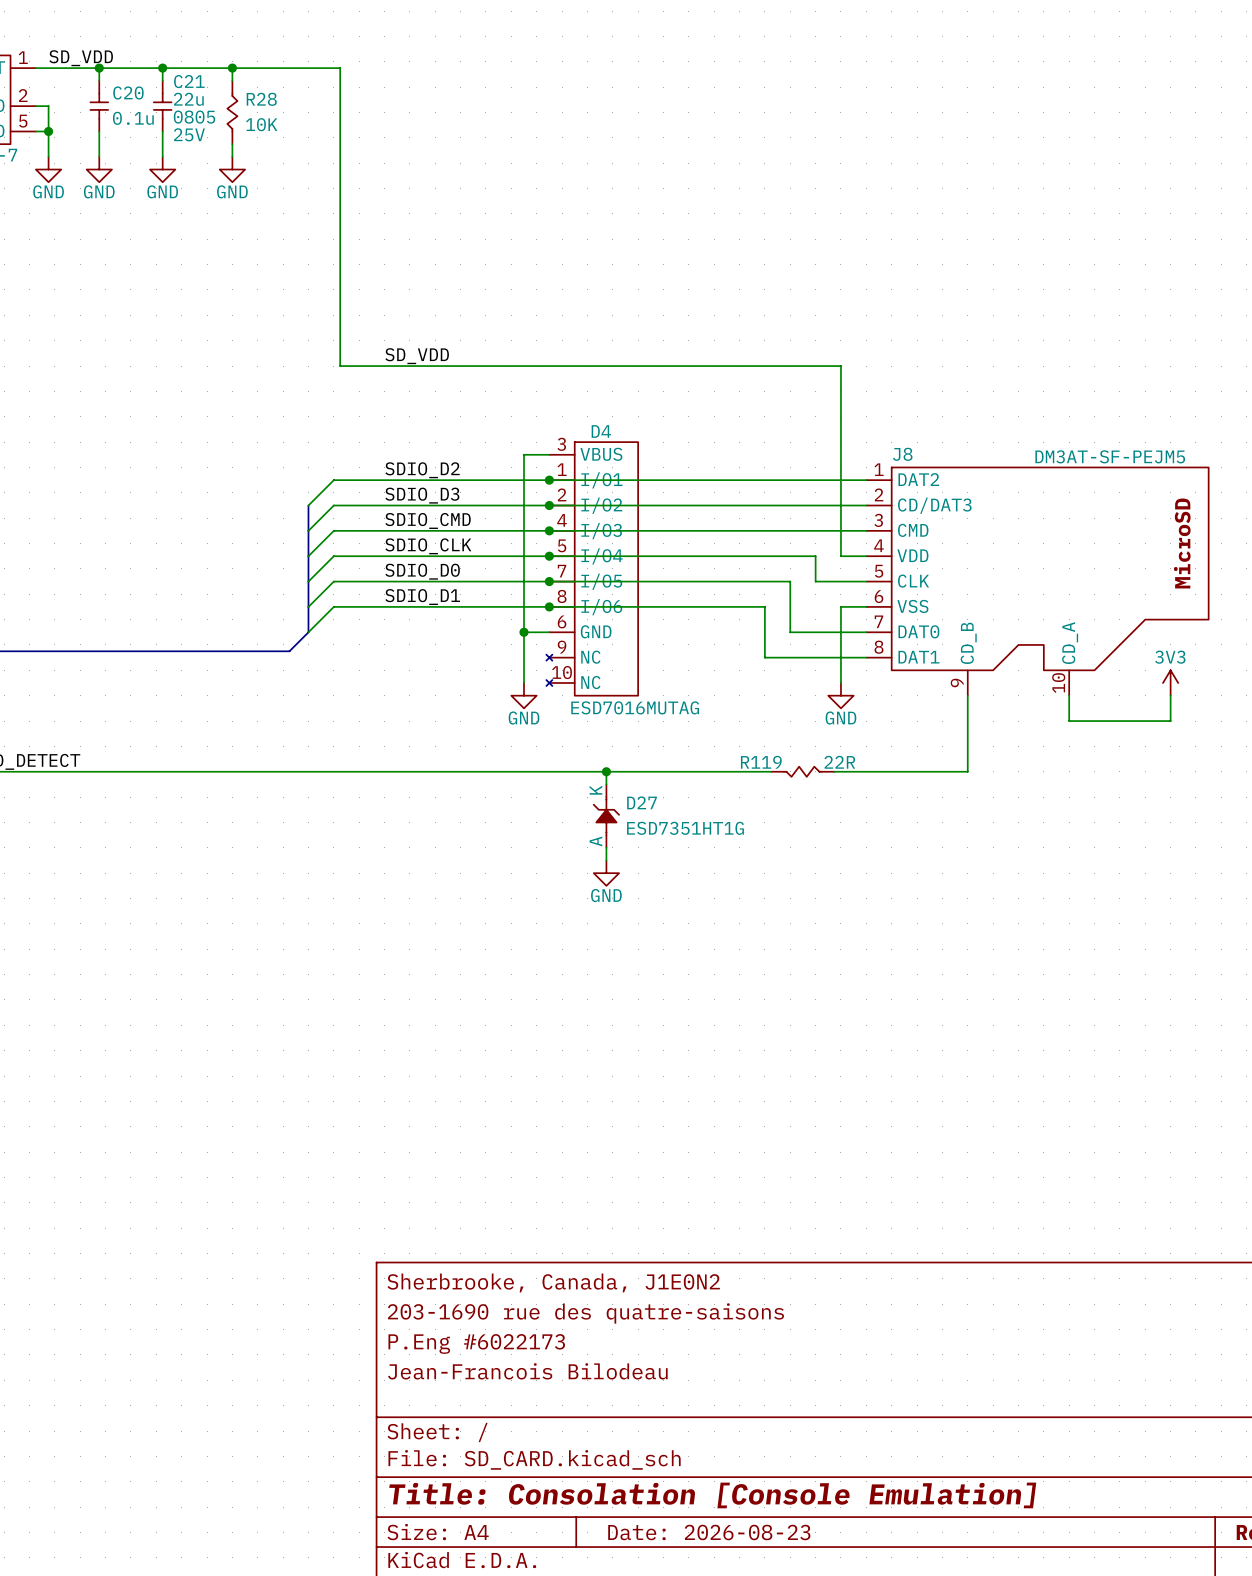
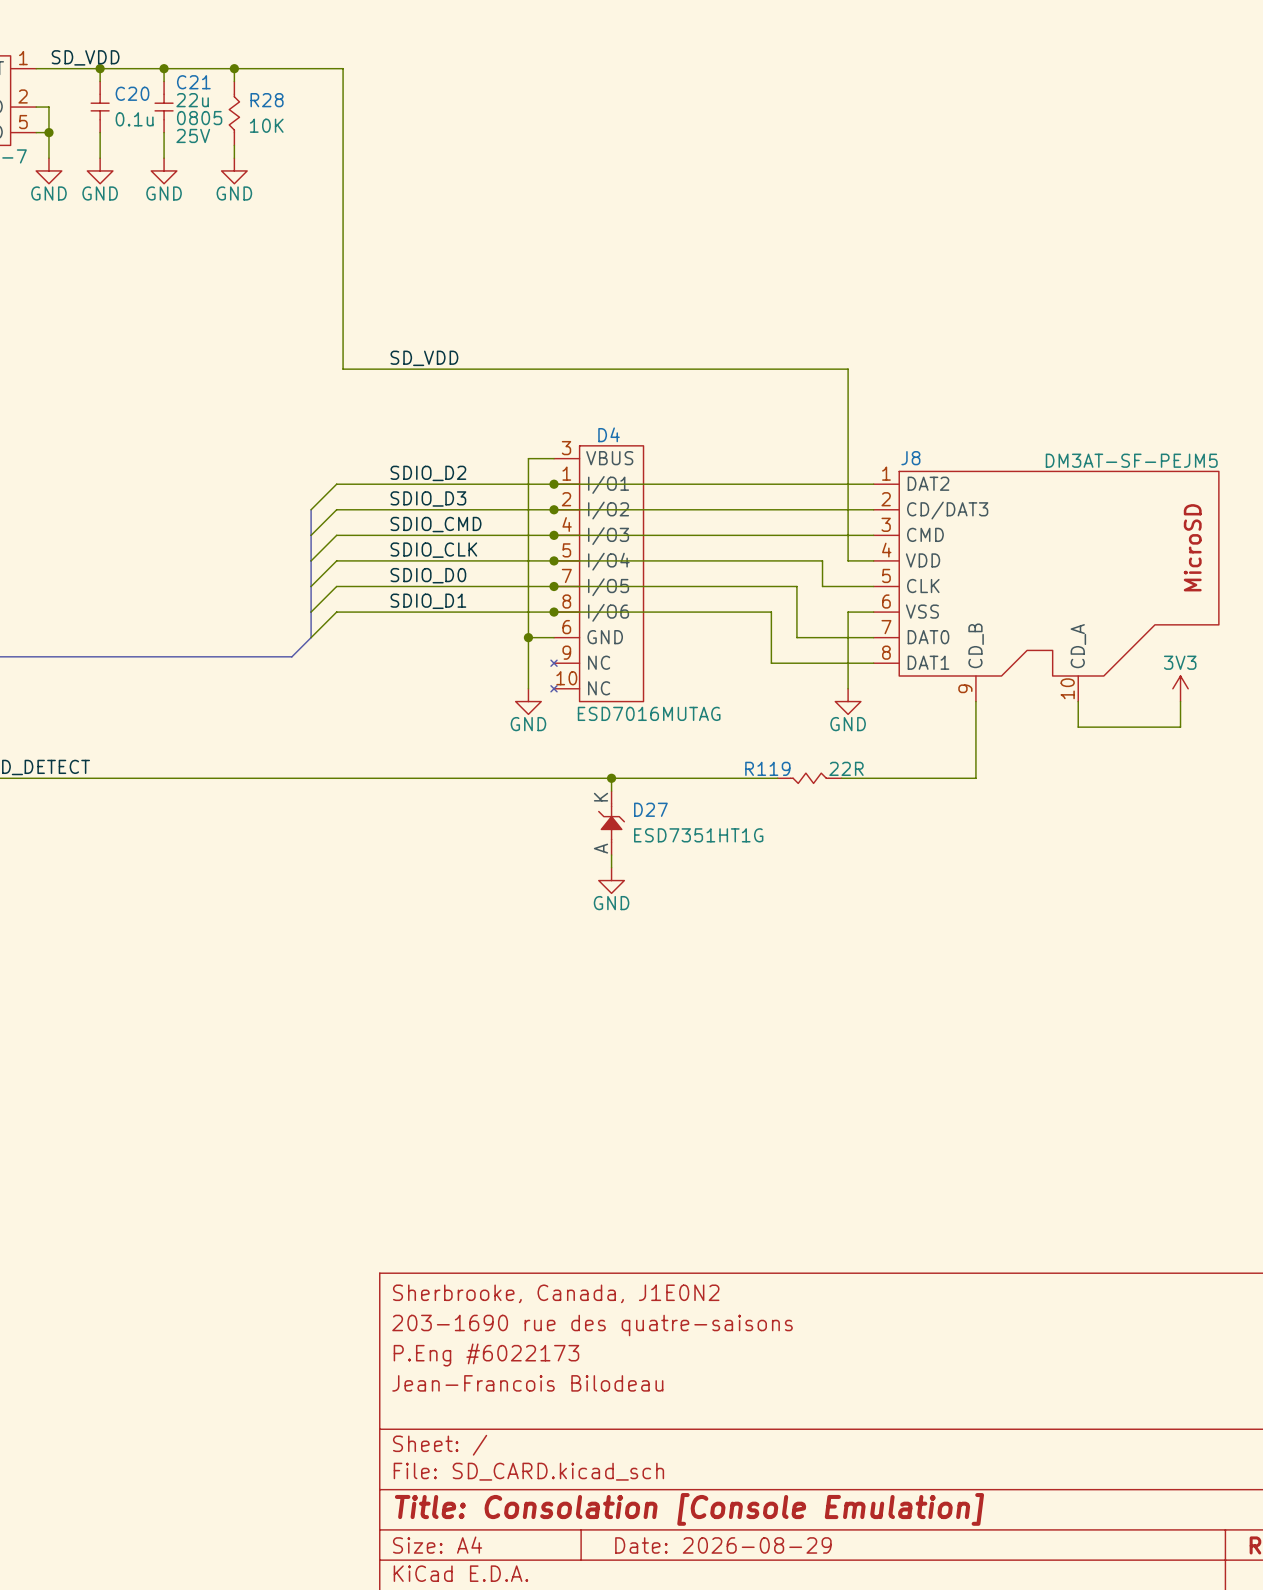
title block: Date: 2026-08-23 (709, 1532) -> Date: 2026-08-29 (723, 1545)

